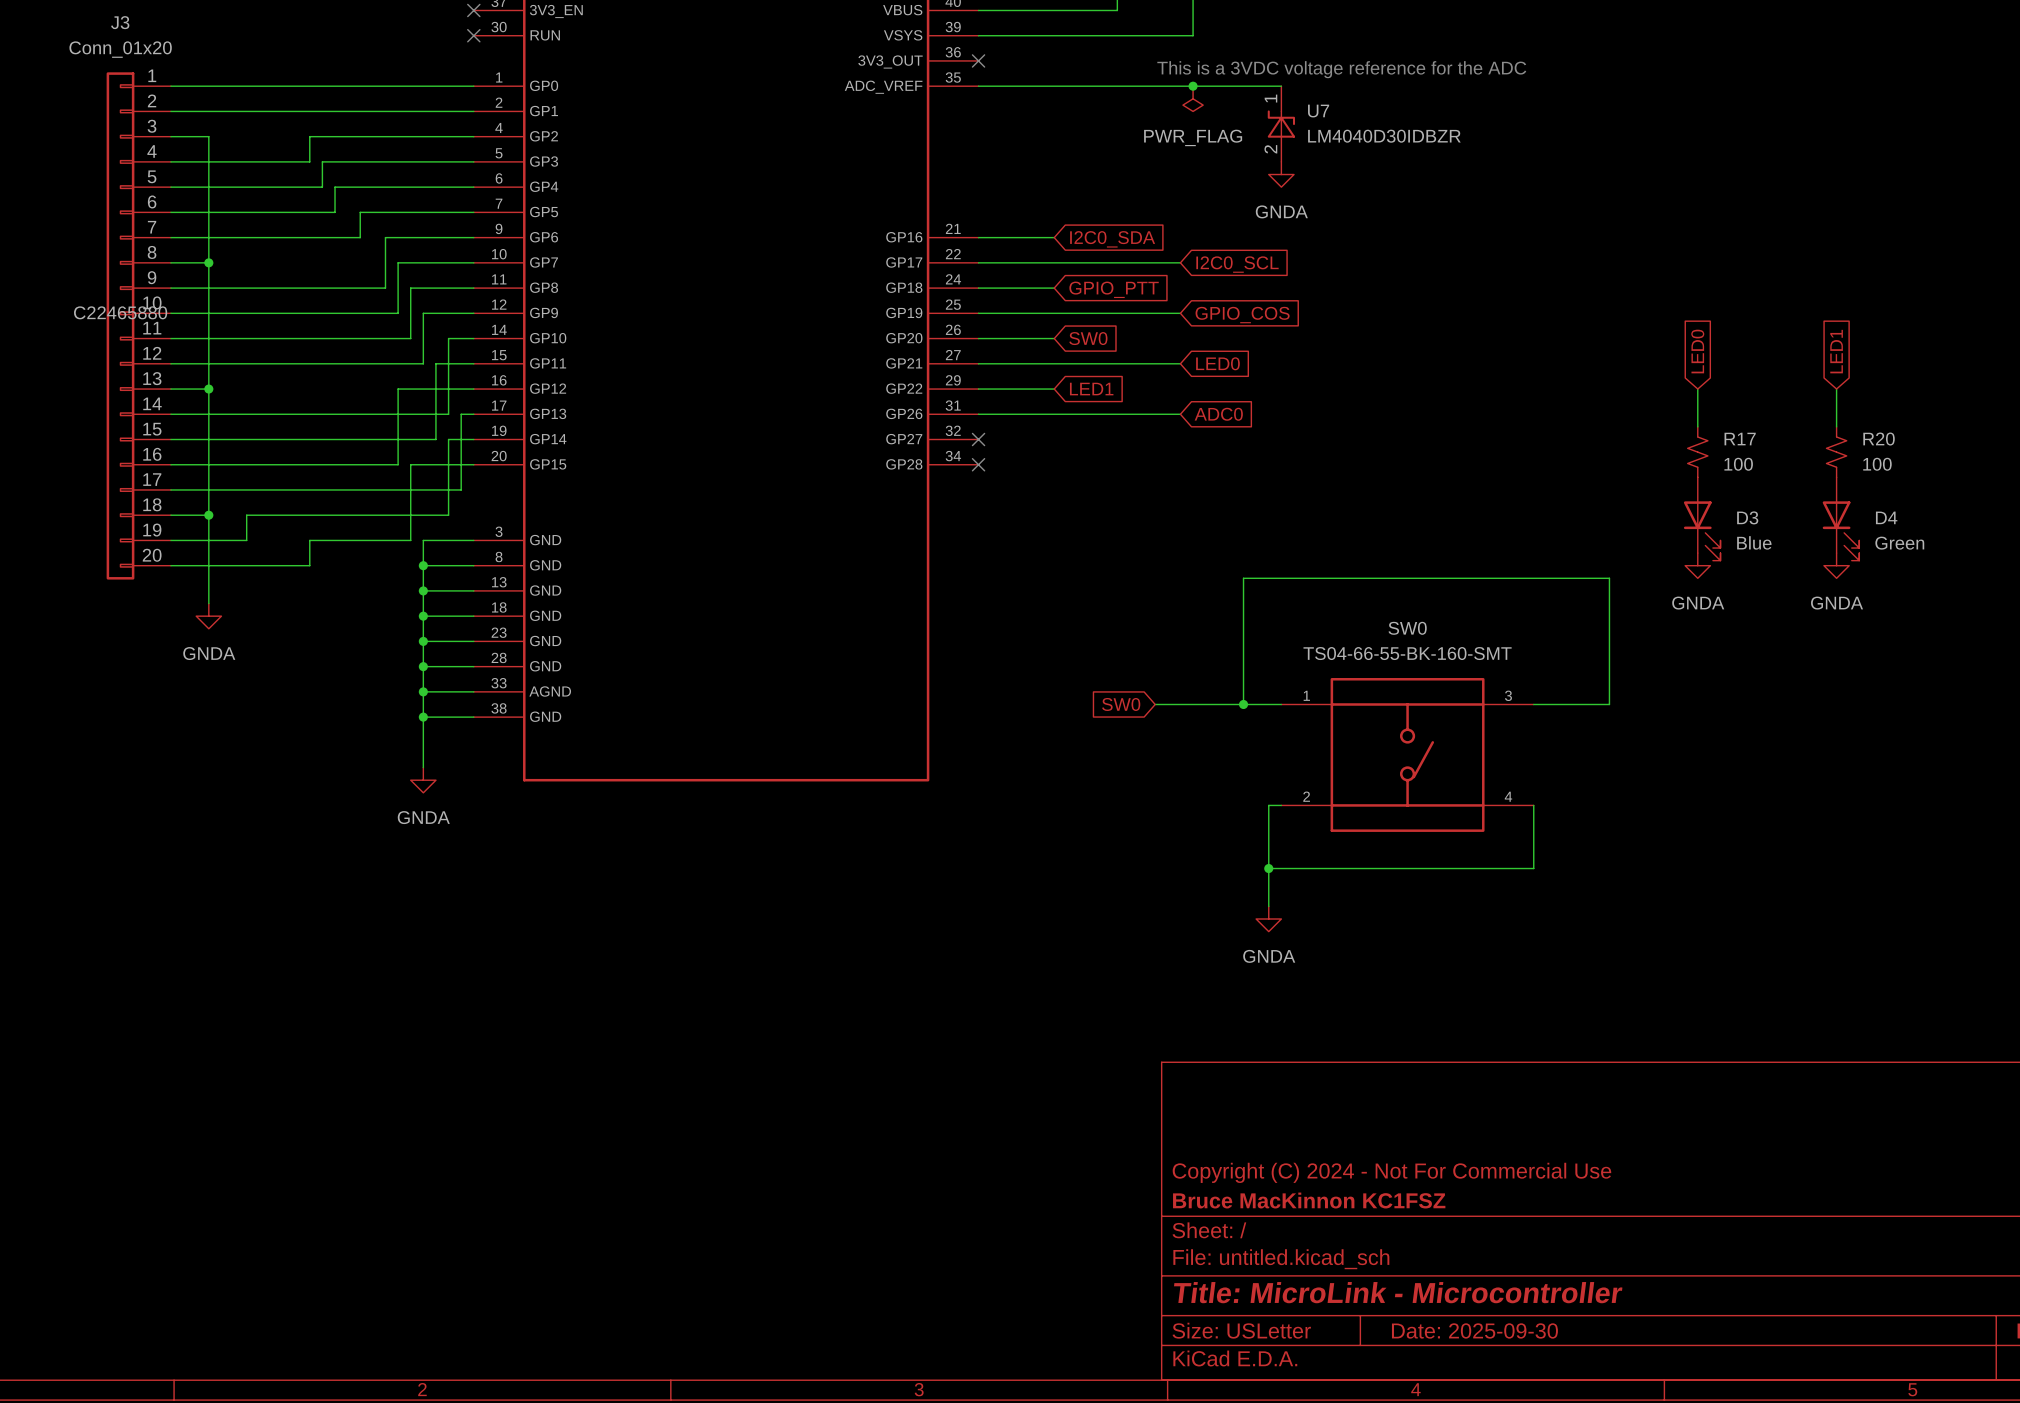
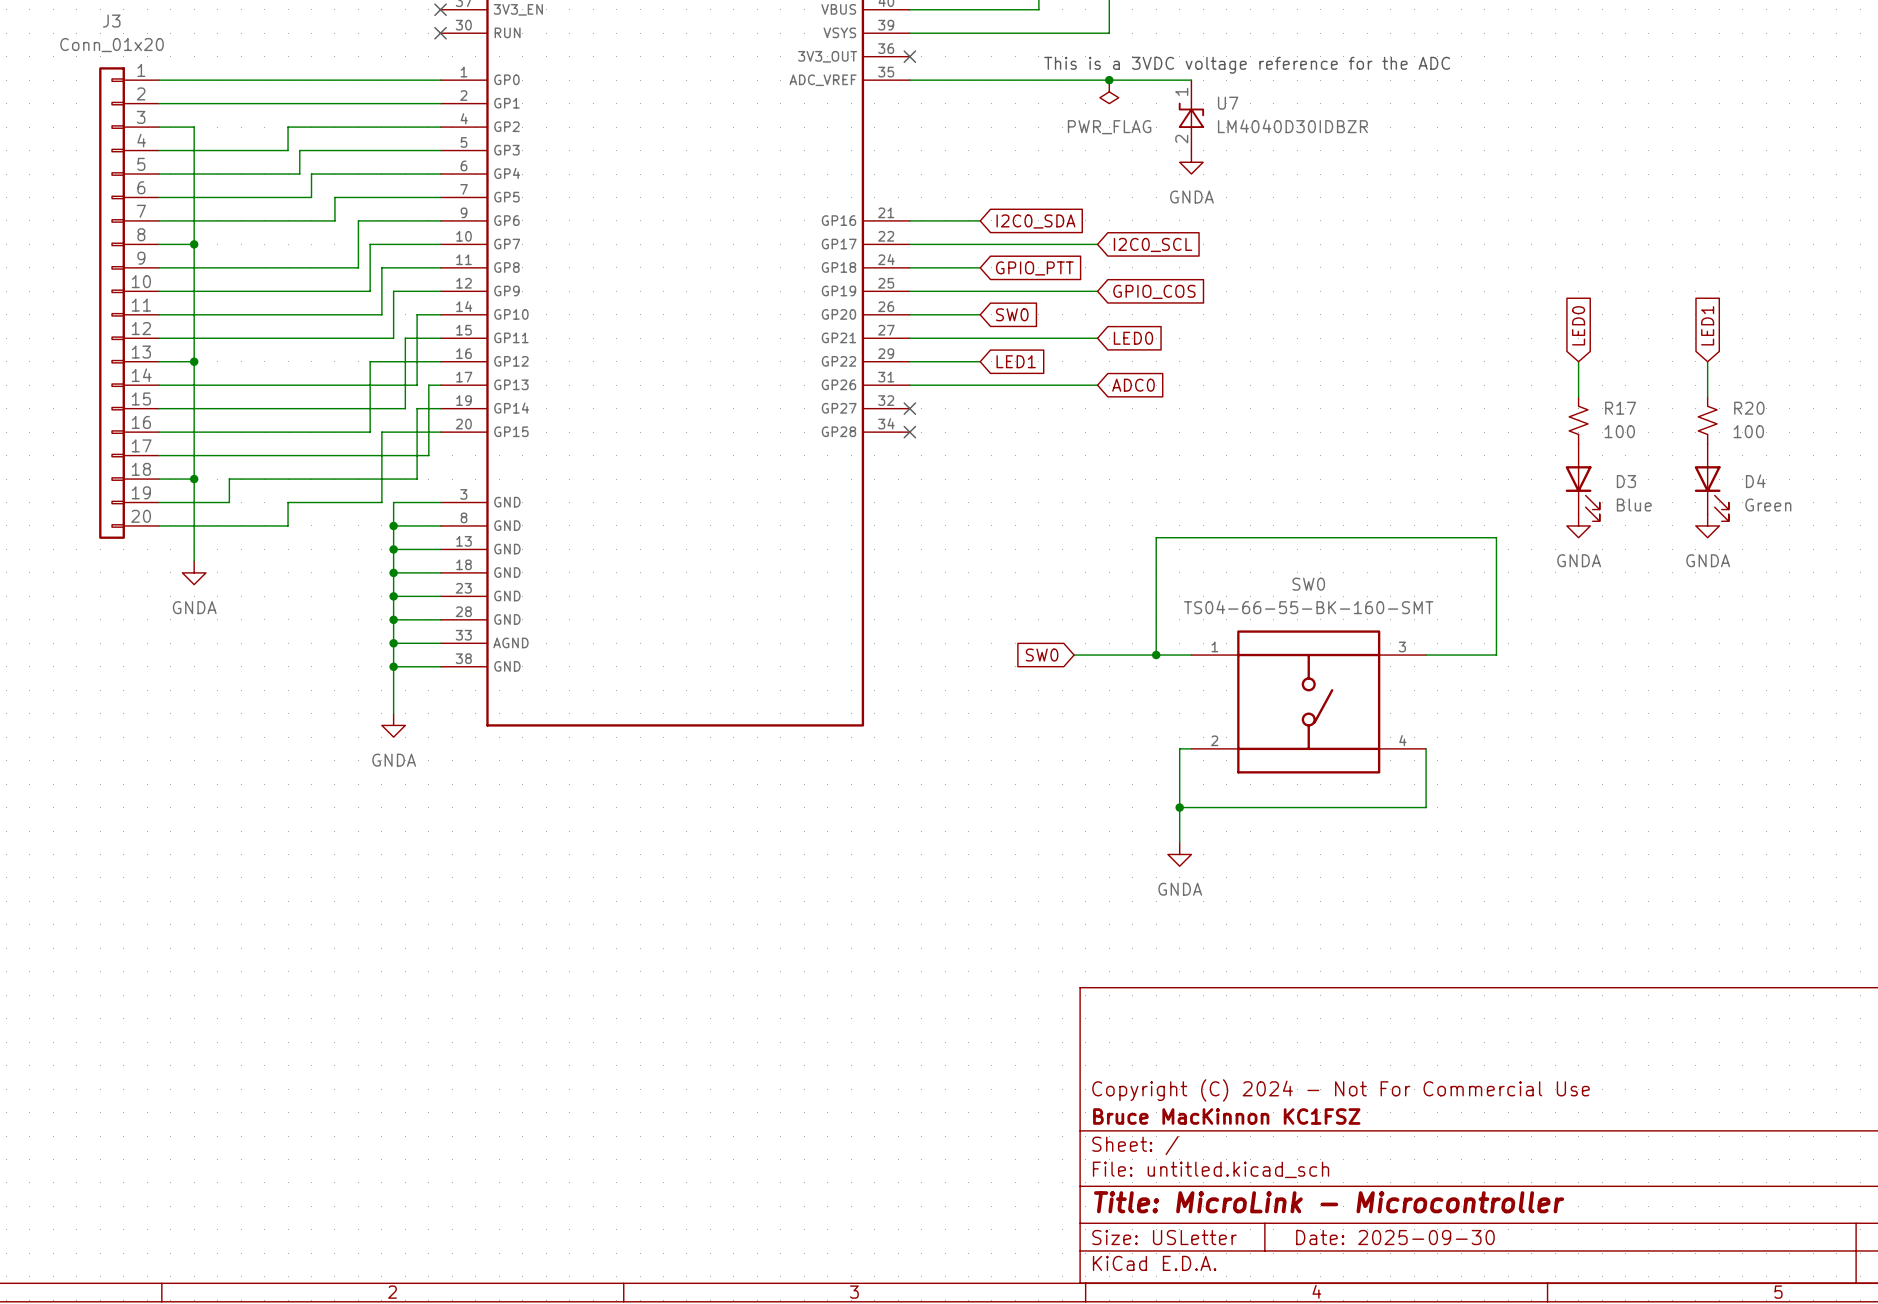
J3 text: C22465880 (120, 312) -> none

